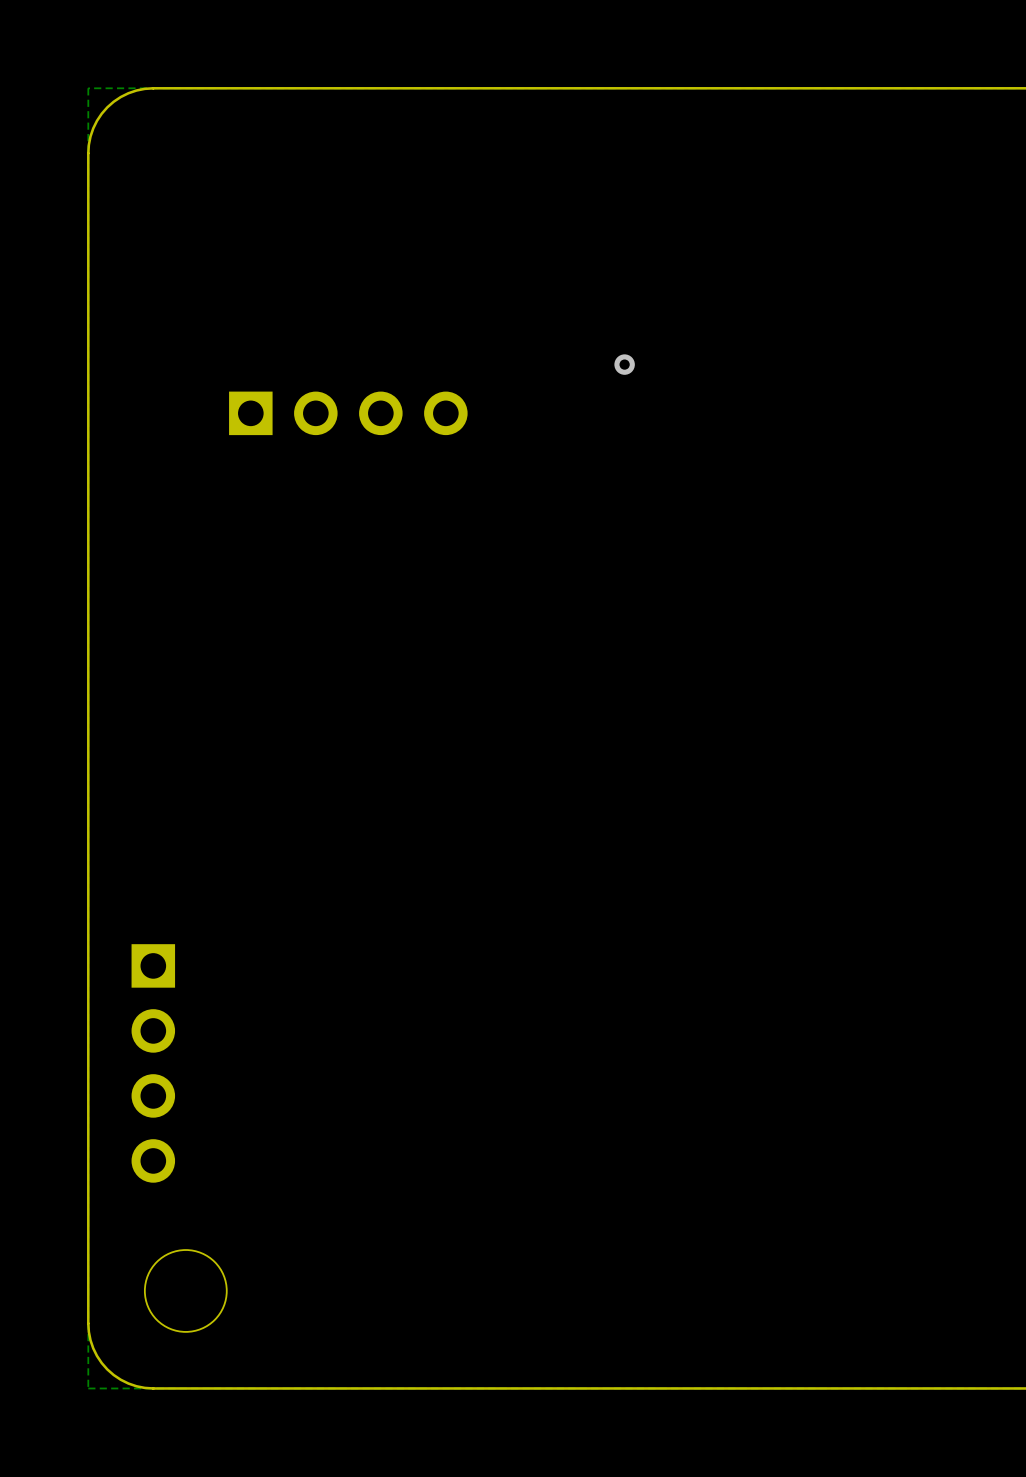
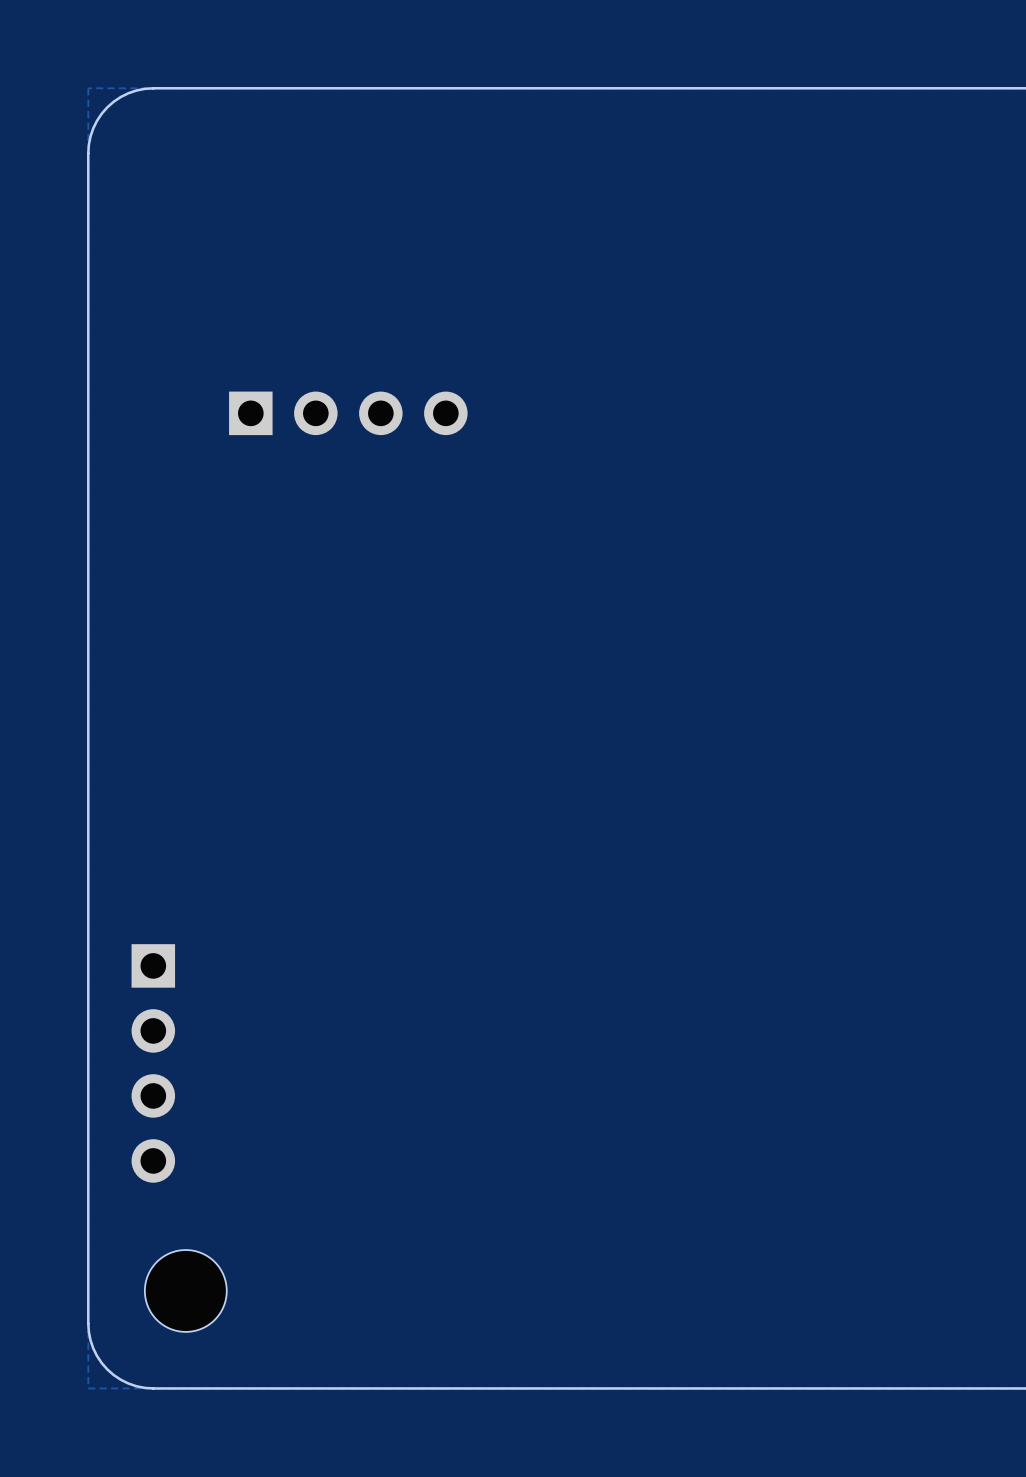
via: (624, 364) -> none

